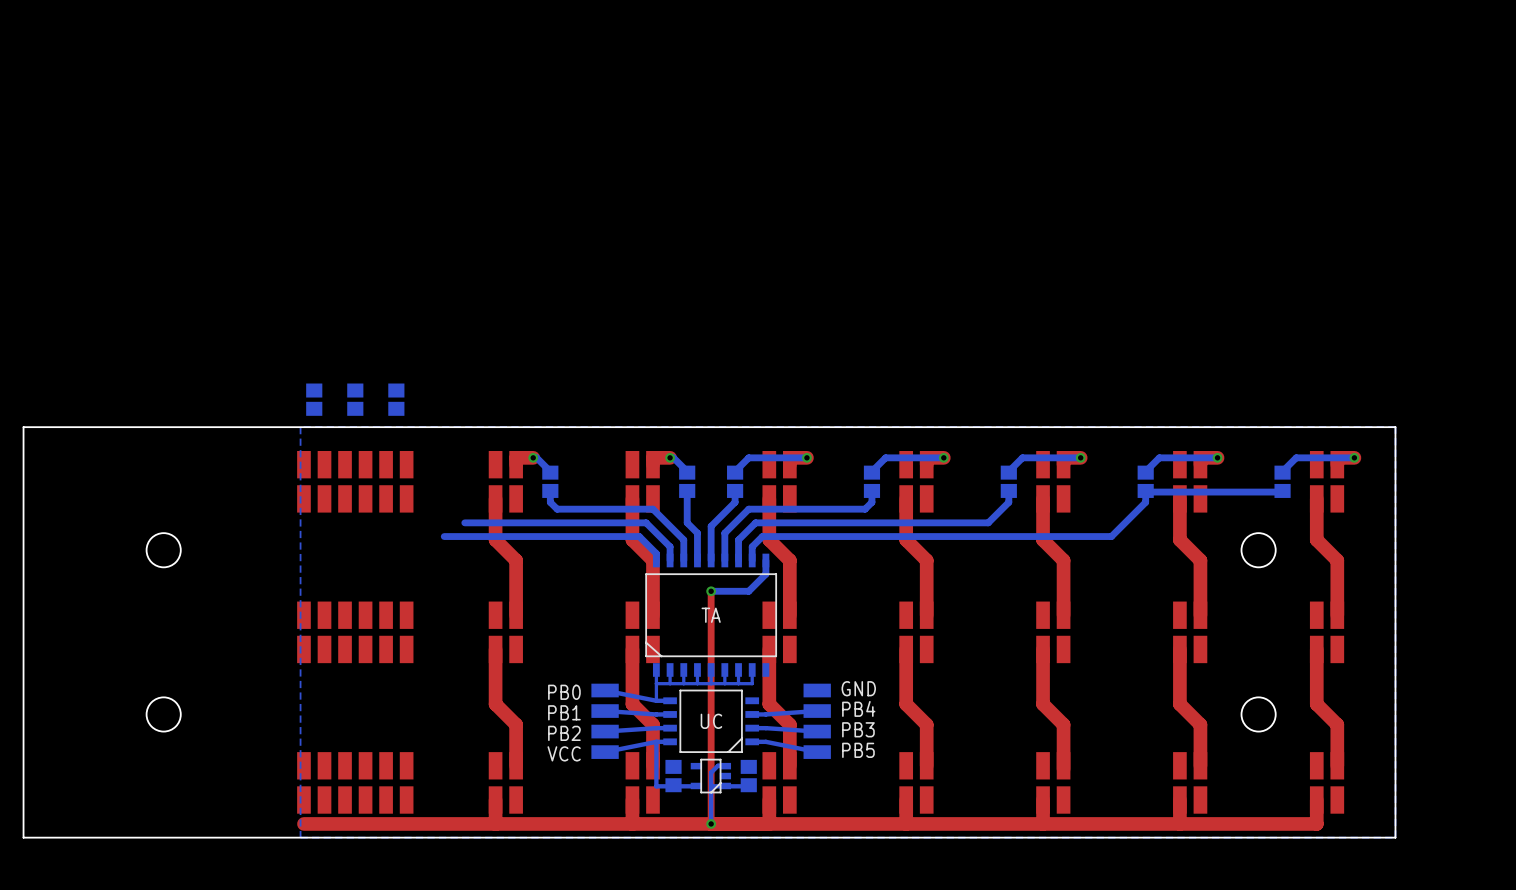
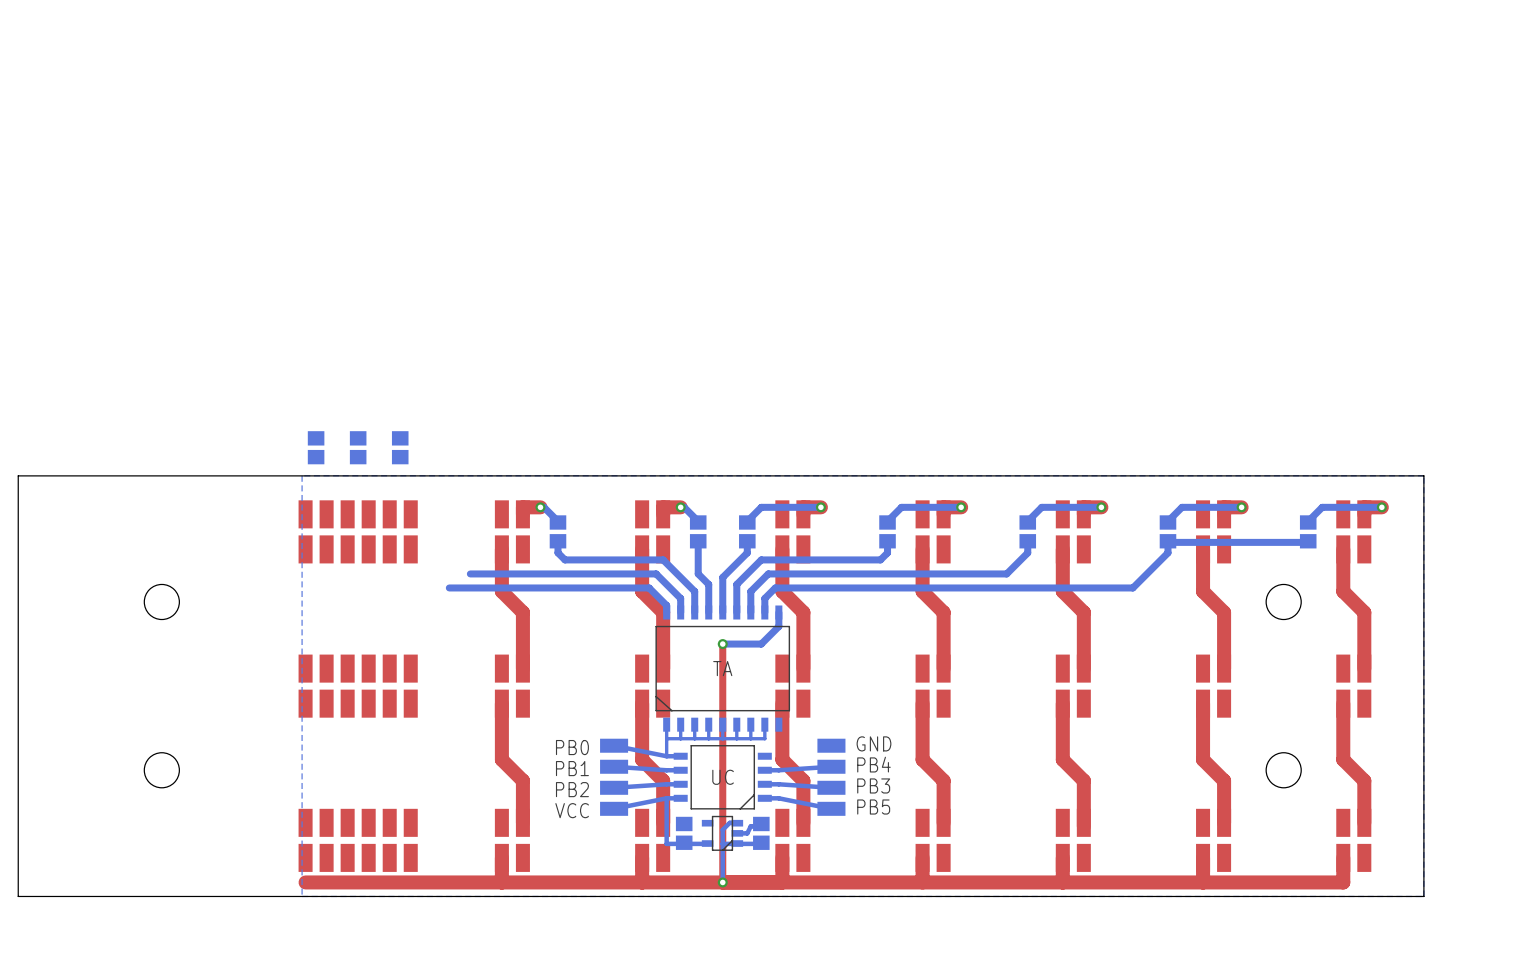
bottom track: none -> (761, 826) (750, 826) (747, 833) (736, 833)

